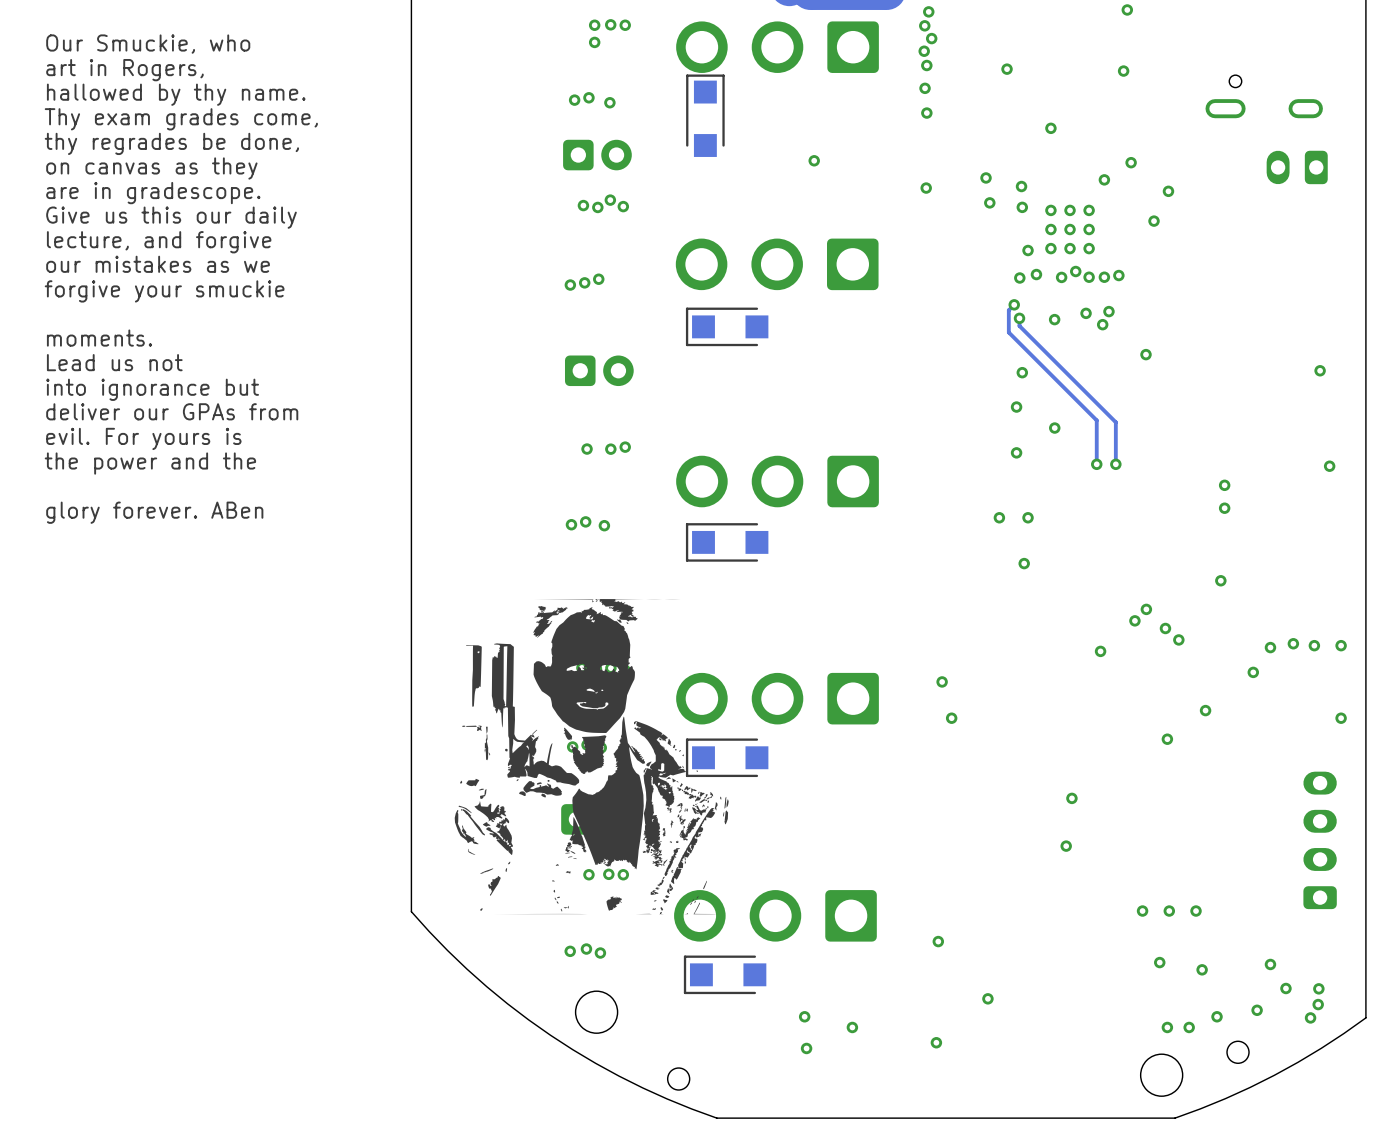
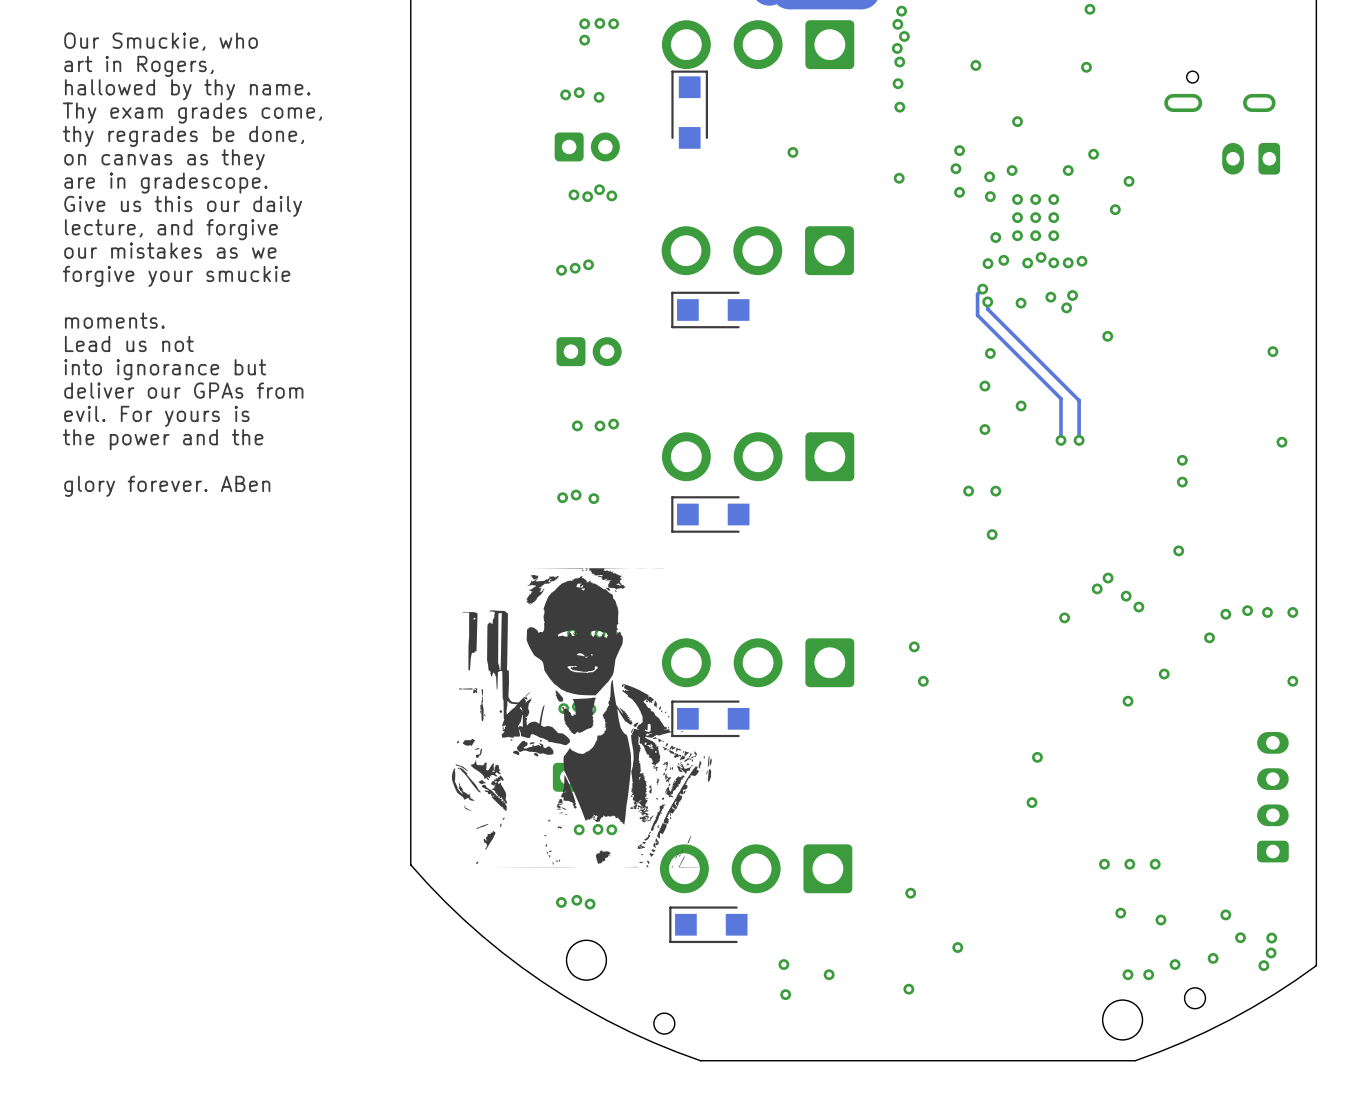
via: none -> (959, 150)
via: none -> (1012, 170)

